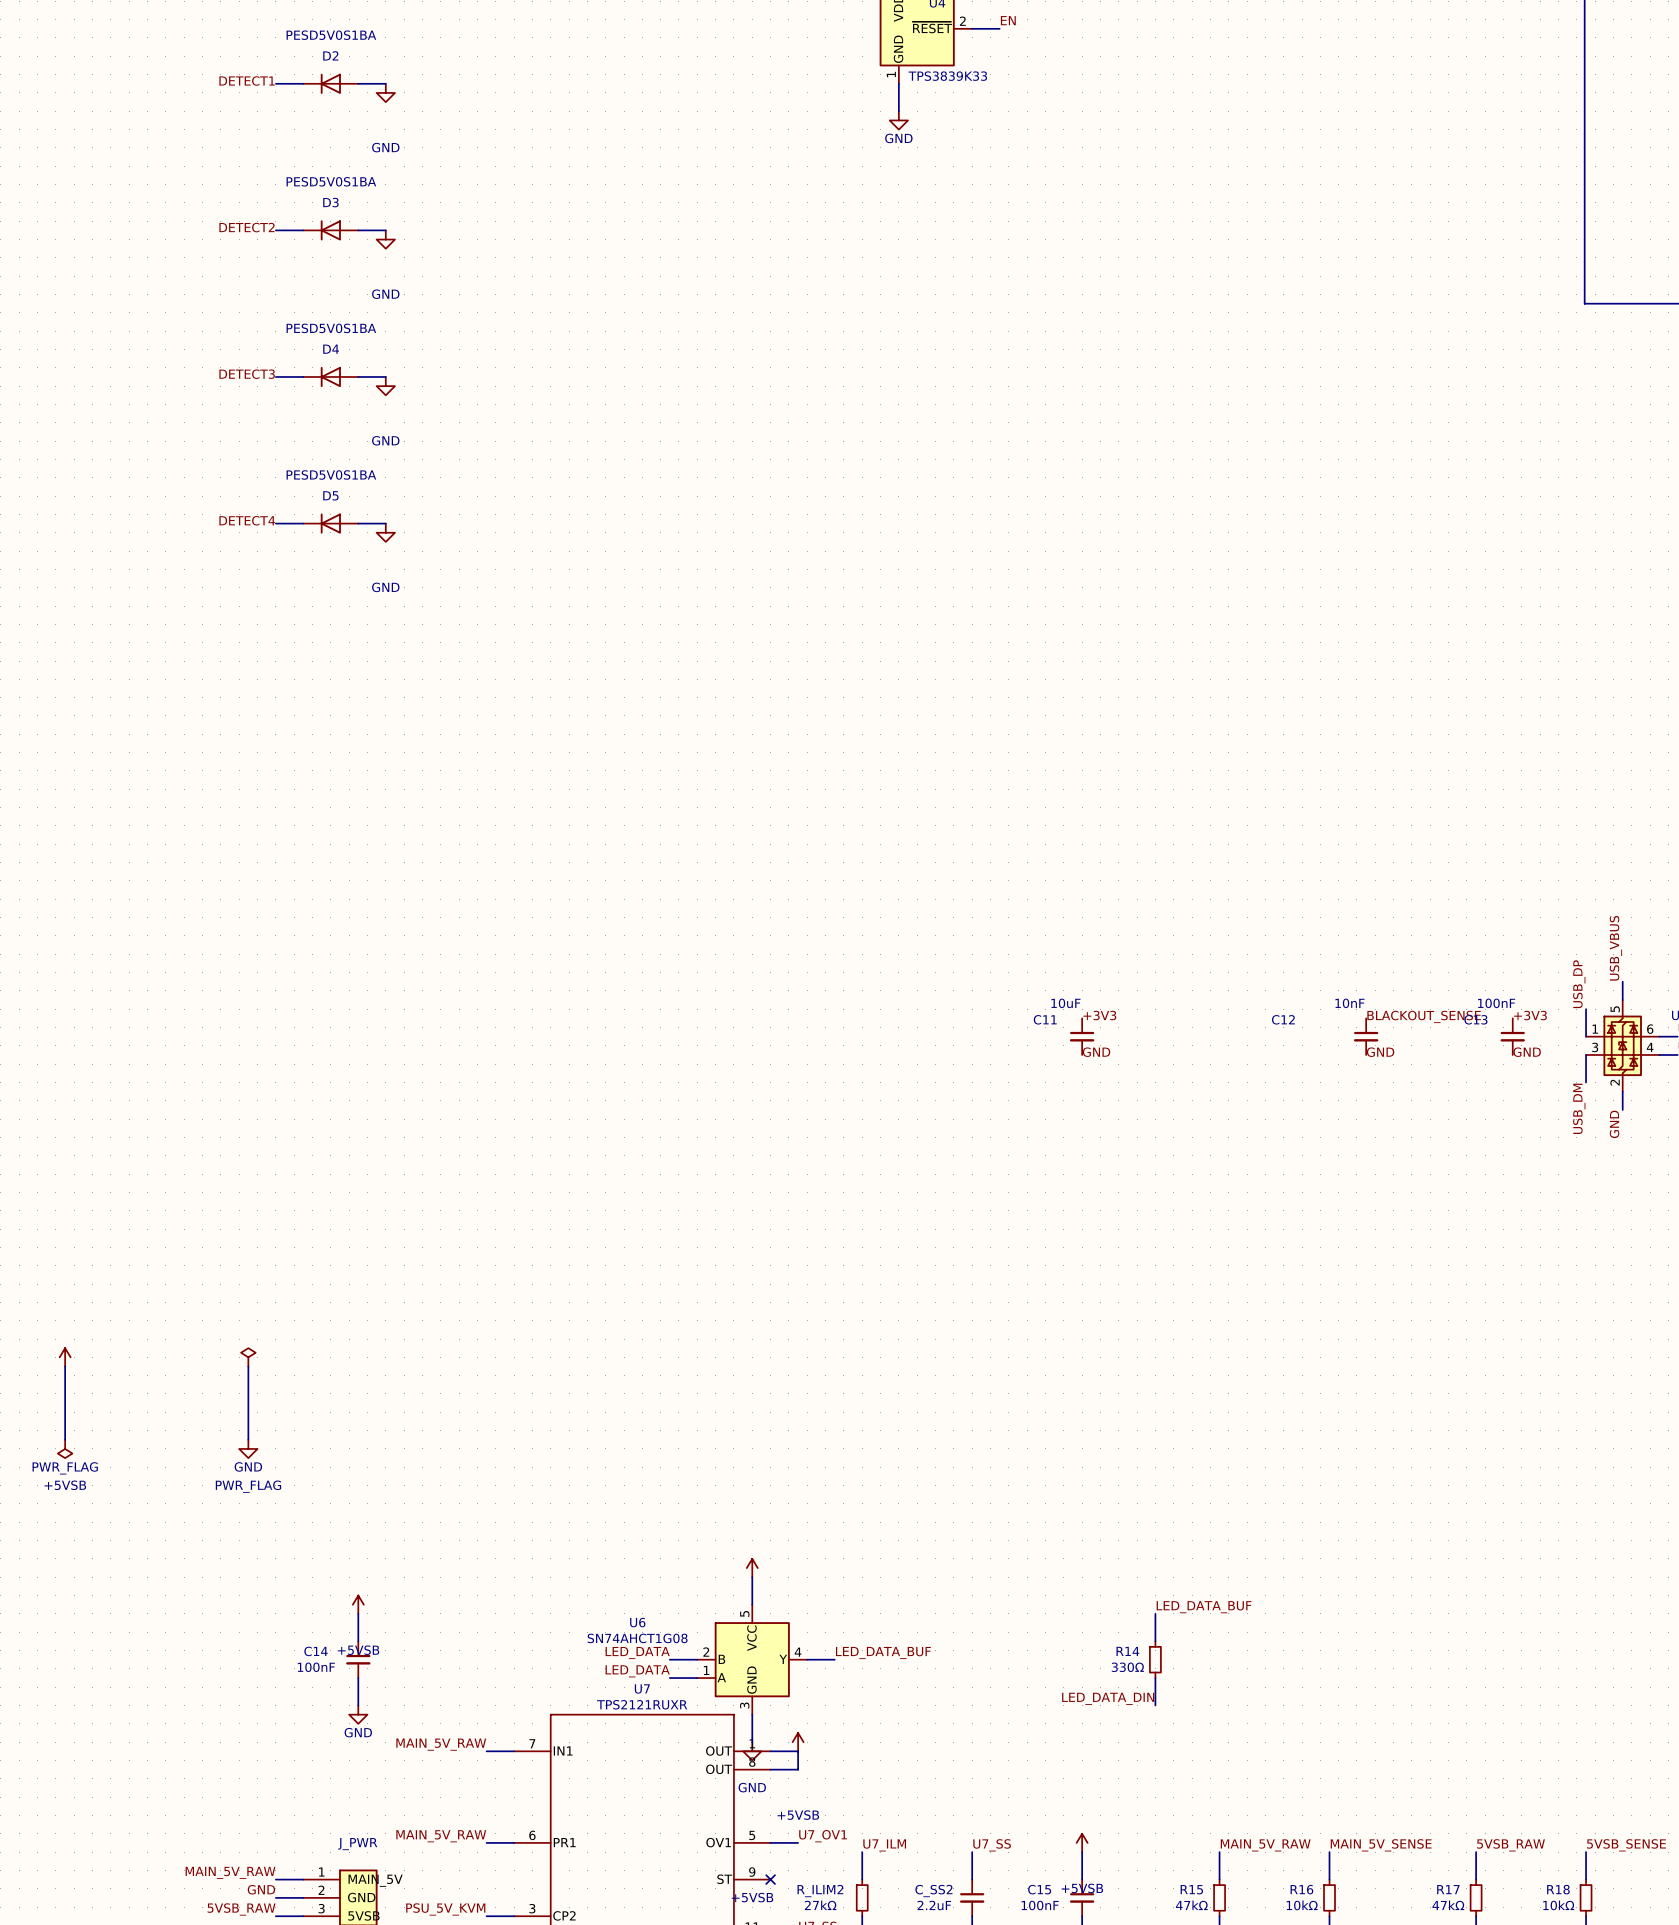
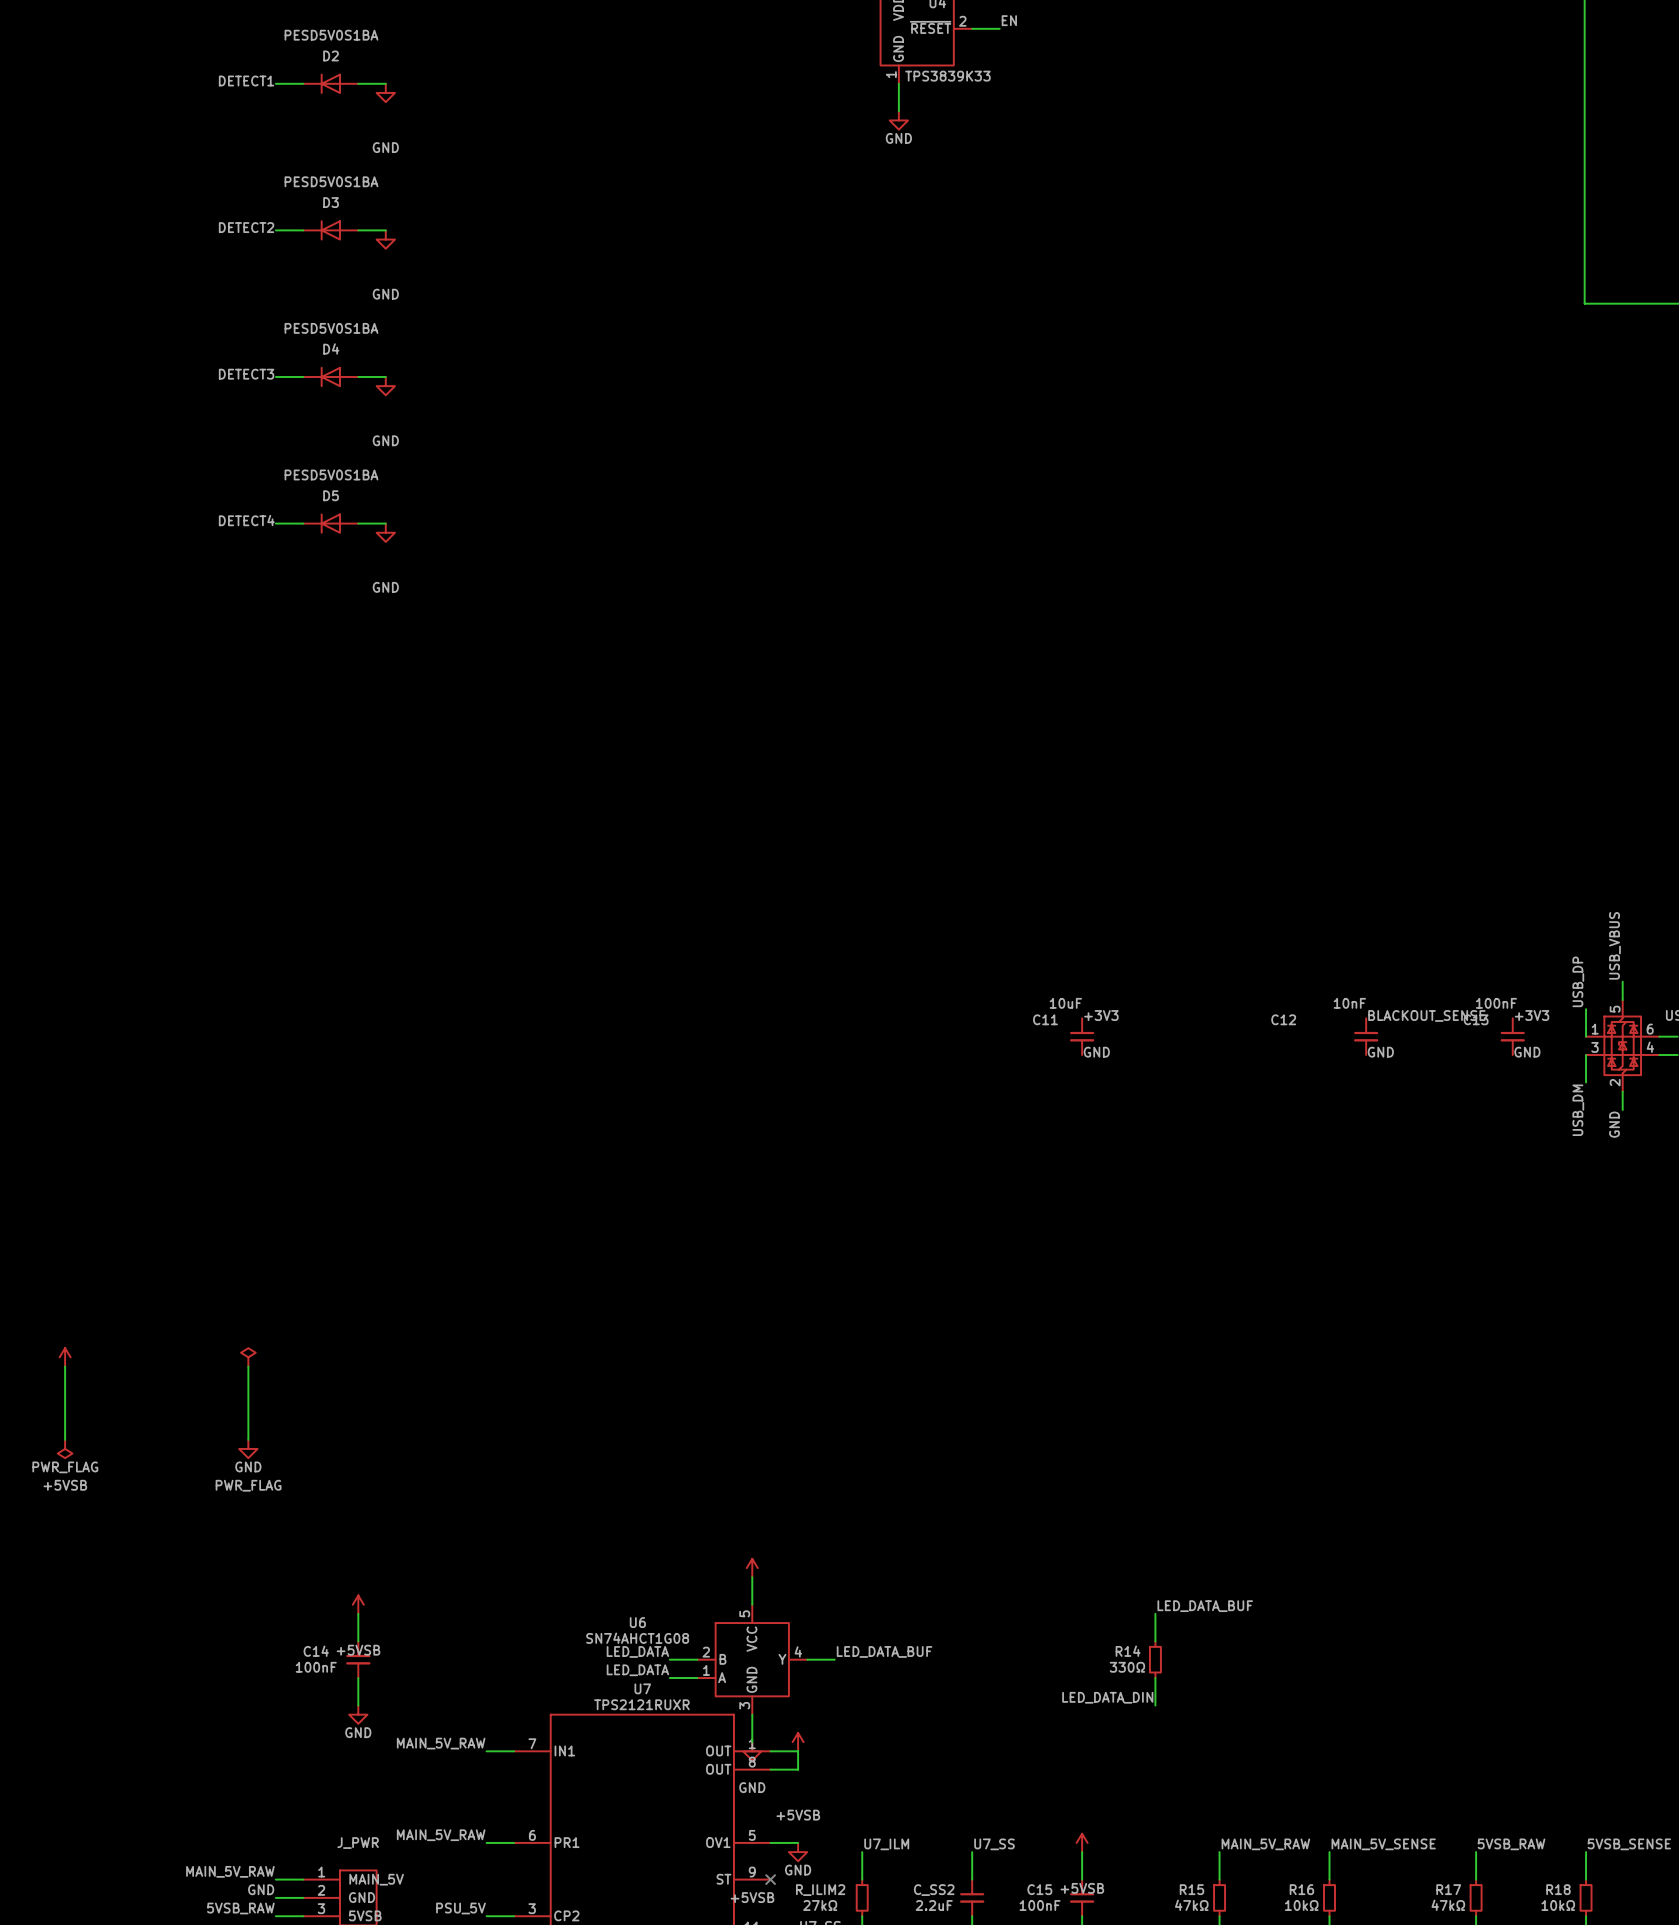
label: U7_OV1 (823, 1836) -> none
power symbol: none -> GND (798, 1852)
label: PSU_5V_KVM (445, 1909) -> PSU_5V (460, 1908)

